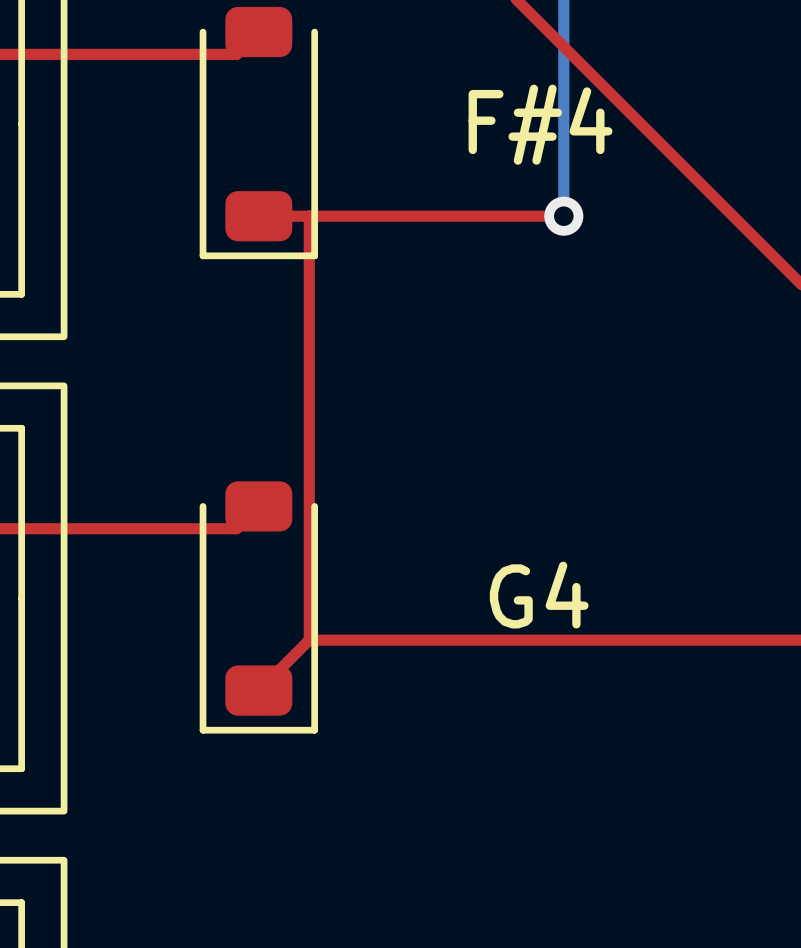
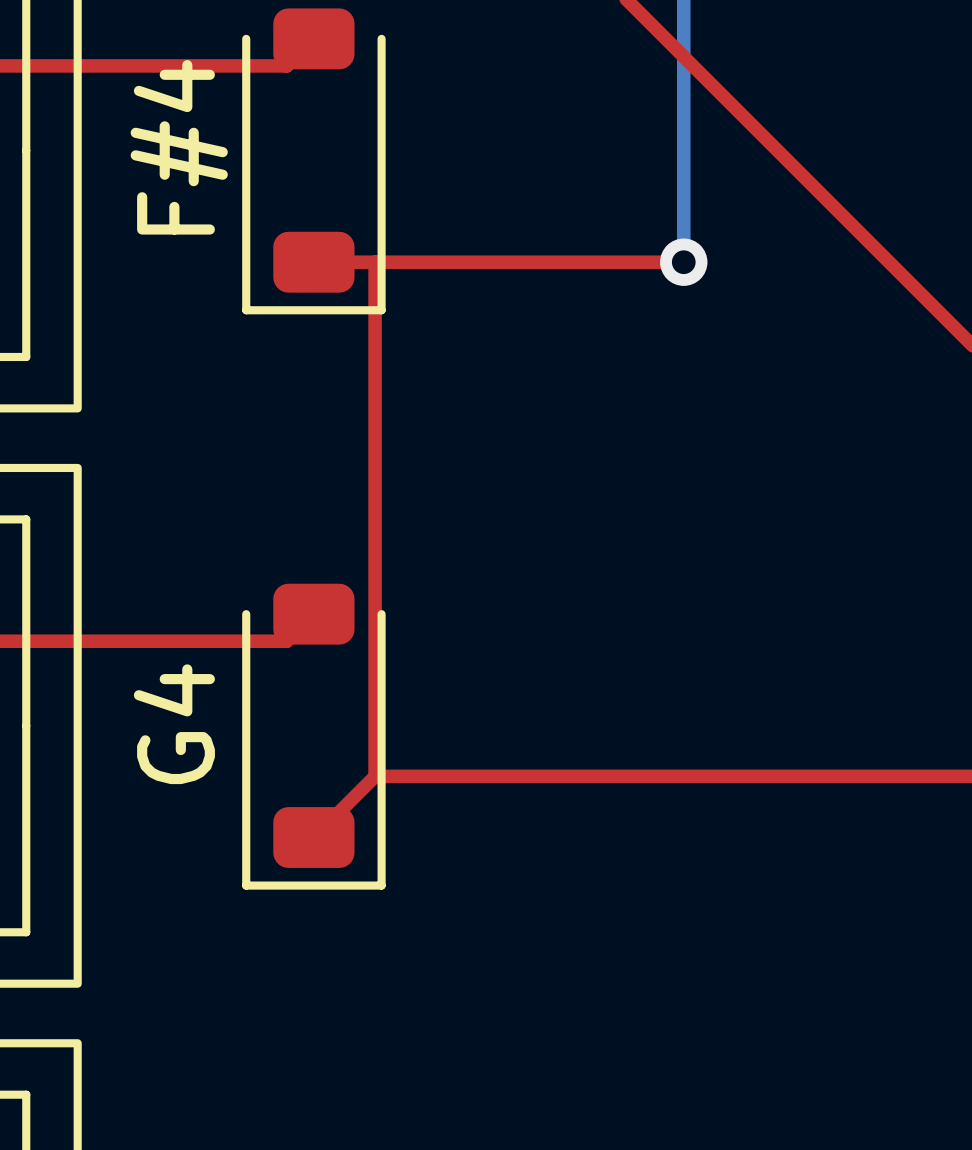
text rotation: 0° (540, 124) -> 90° counterclockwise (179, 147)
text position: F#4 (540, 124) -> F#4 (179, 147)
text rotation: 0° (539, 595) -> 90° counterclockwise (174, 724)
text position: G4 (539, 595) -> G4 (174, 724)

